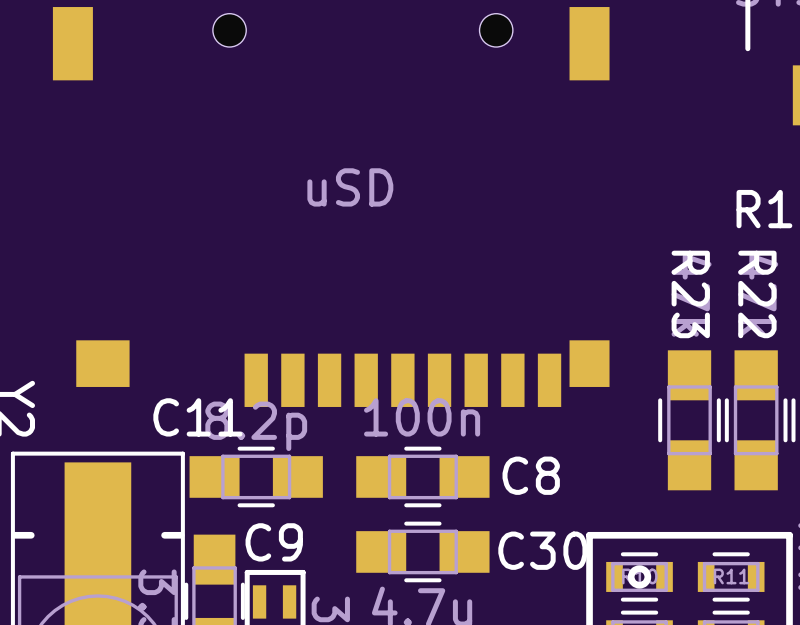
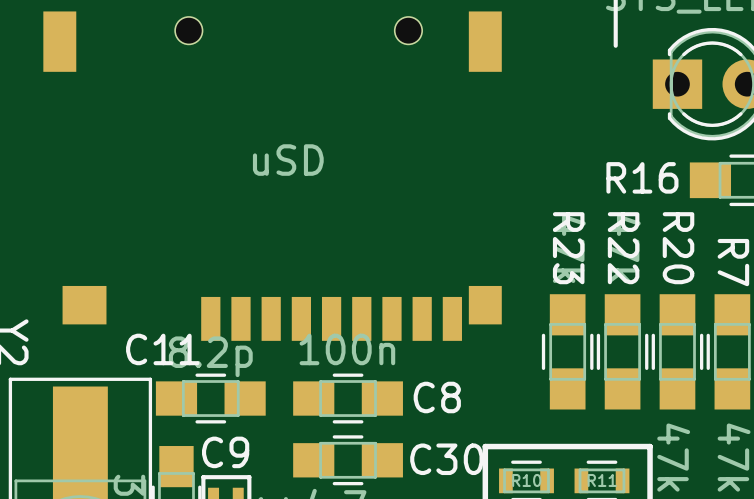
line: (31, 535) (14, 535) -> none
line: (181, 535) (164, 535) -> none
drawing: [627, 565, 652, 589] -> none

